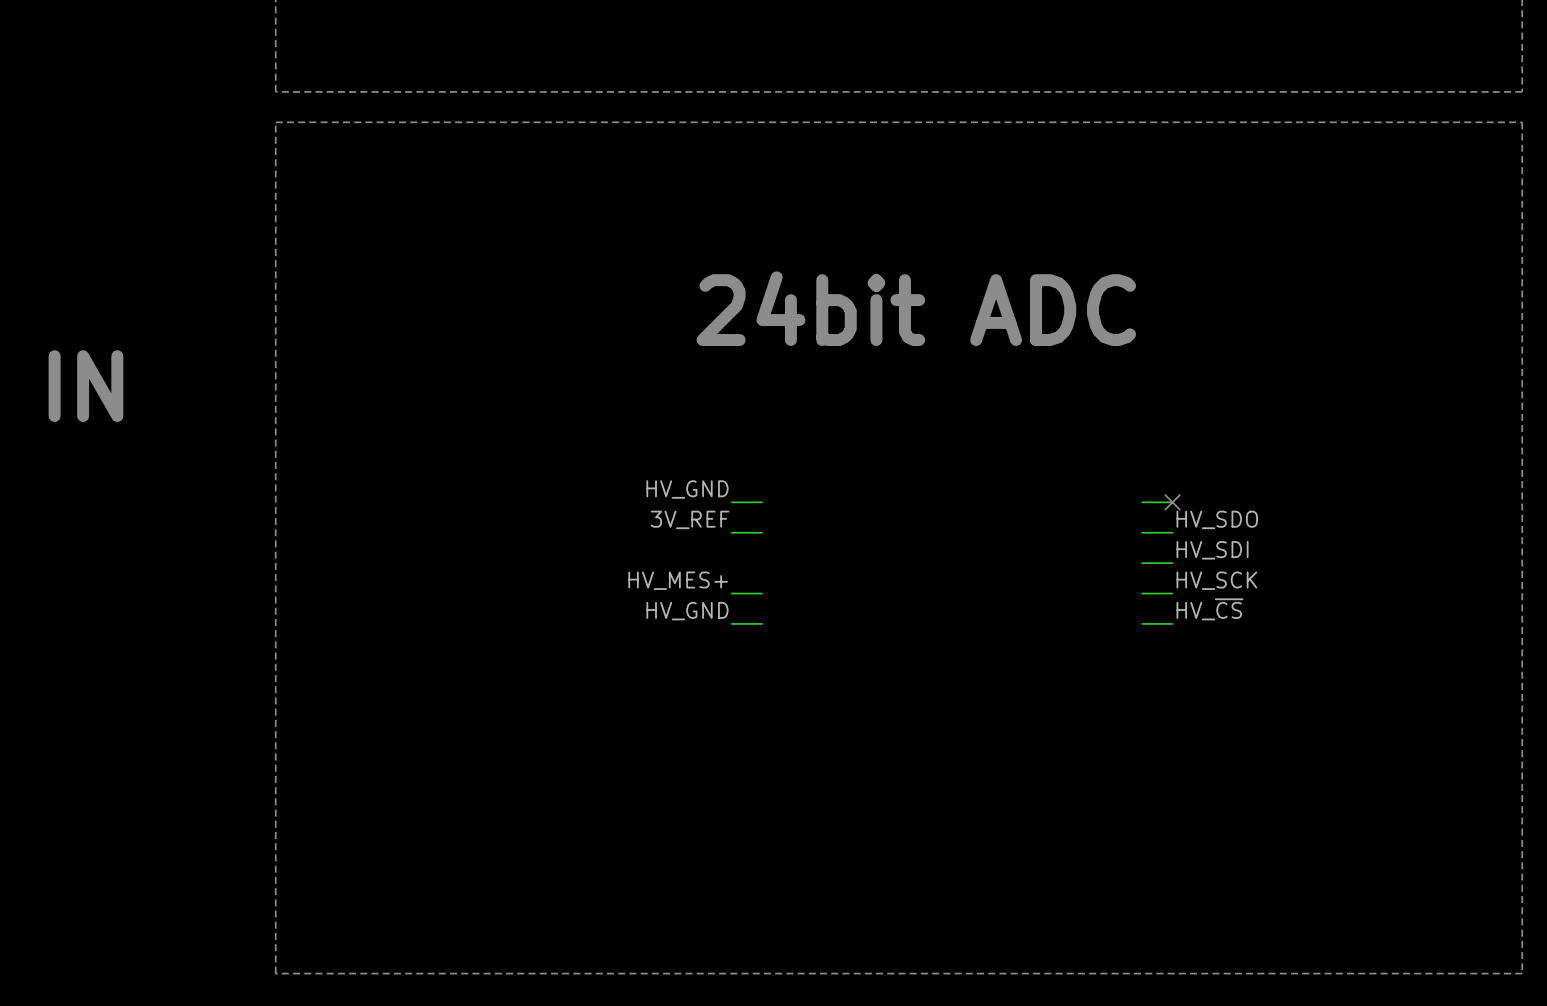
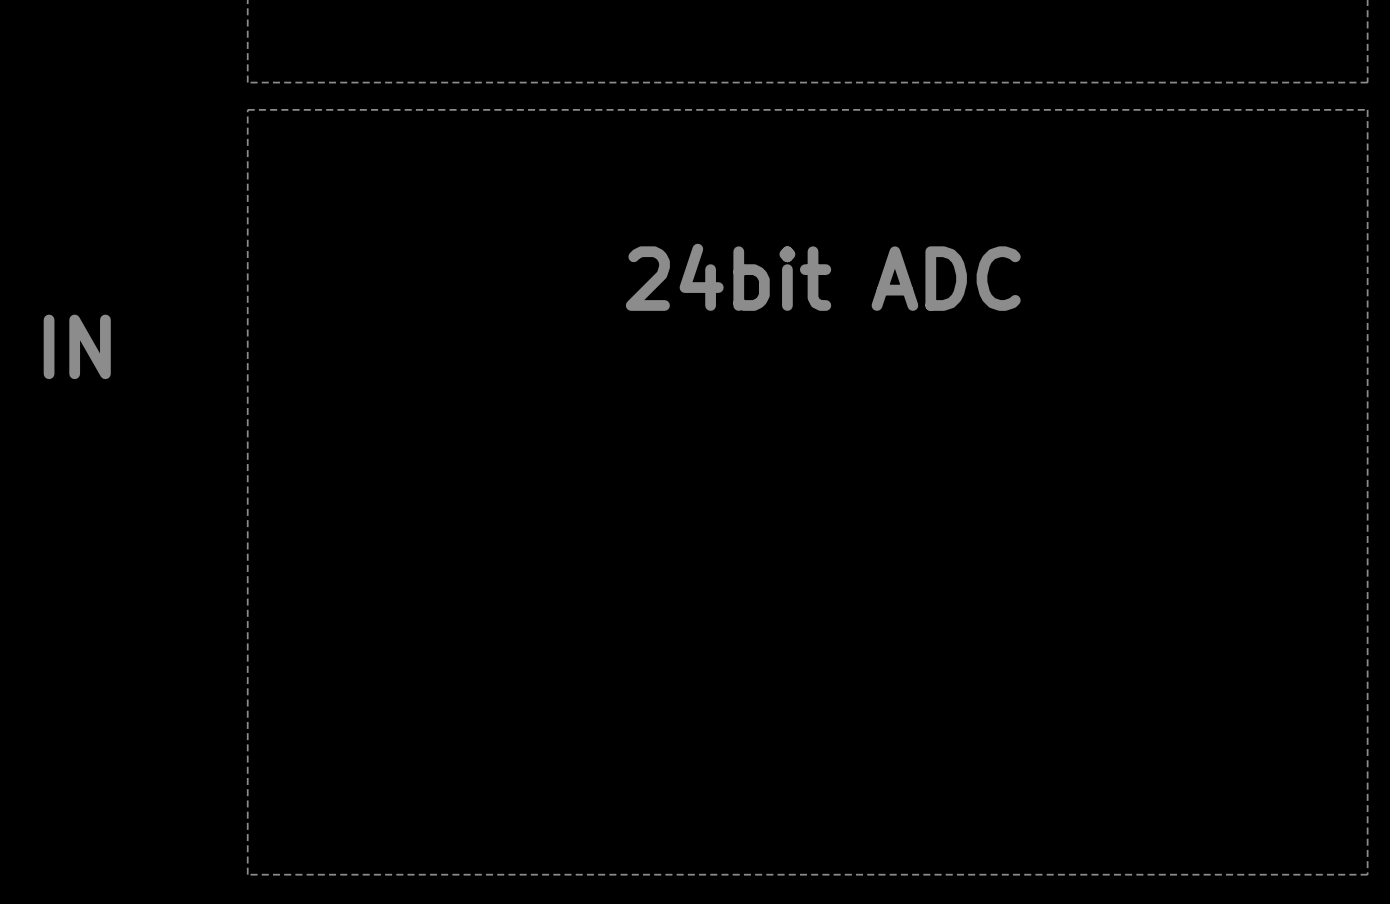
label: HV_GND (687, 489) -> none
wire: (731, 502) (762, 502) -> none
wire: (1142, 502) (1172, 502) -> none
no-connect mark: (1172, 502) -> none
label: 3V_REF (690, 519) -> none
label: HV_SDO (1217, 519) -> none
wire: (731, 532) (762, 532) -> none
wire: (1142, 532) (1172, 532) -> none
label: HV_SDI (1212, 550) -> none
wire: (1142, 563) (1172, 563) -> none
label: HV_MES+ (678, 580) -> none
label: HV_SCK (1216, 580) -> none
wire: (731, 593) (762, 593) -> none
wire: (1142, 593) (1172, 593) -> none
label: HV_~{CS} (1209, 609) -> none
label: HV_GND (687, 611) -> none
wire: (731, 623) (762, 623) -> none
wire: (1142, 623) (1172, 623) -> none

